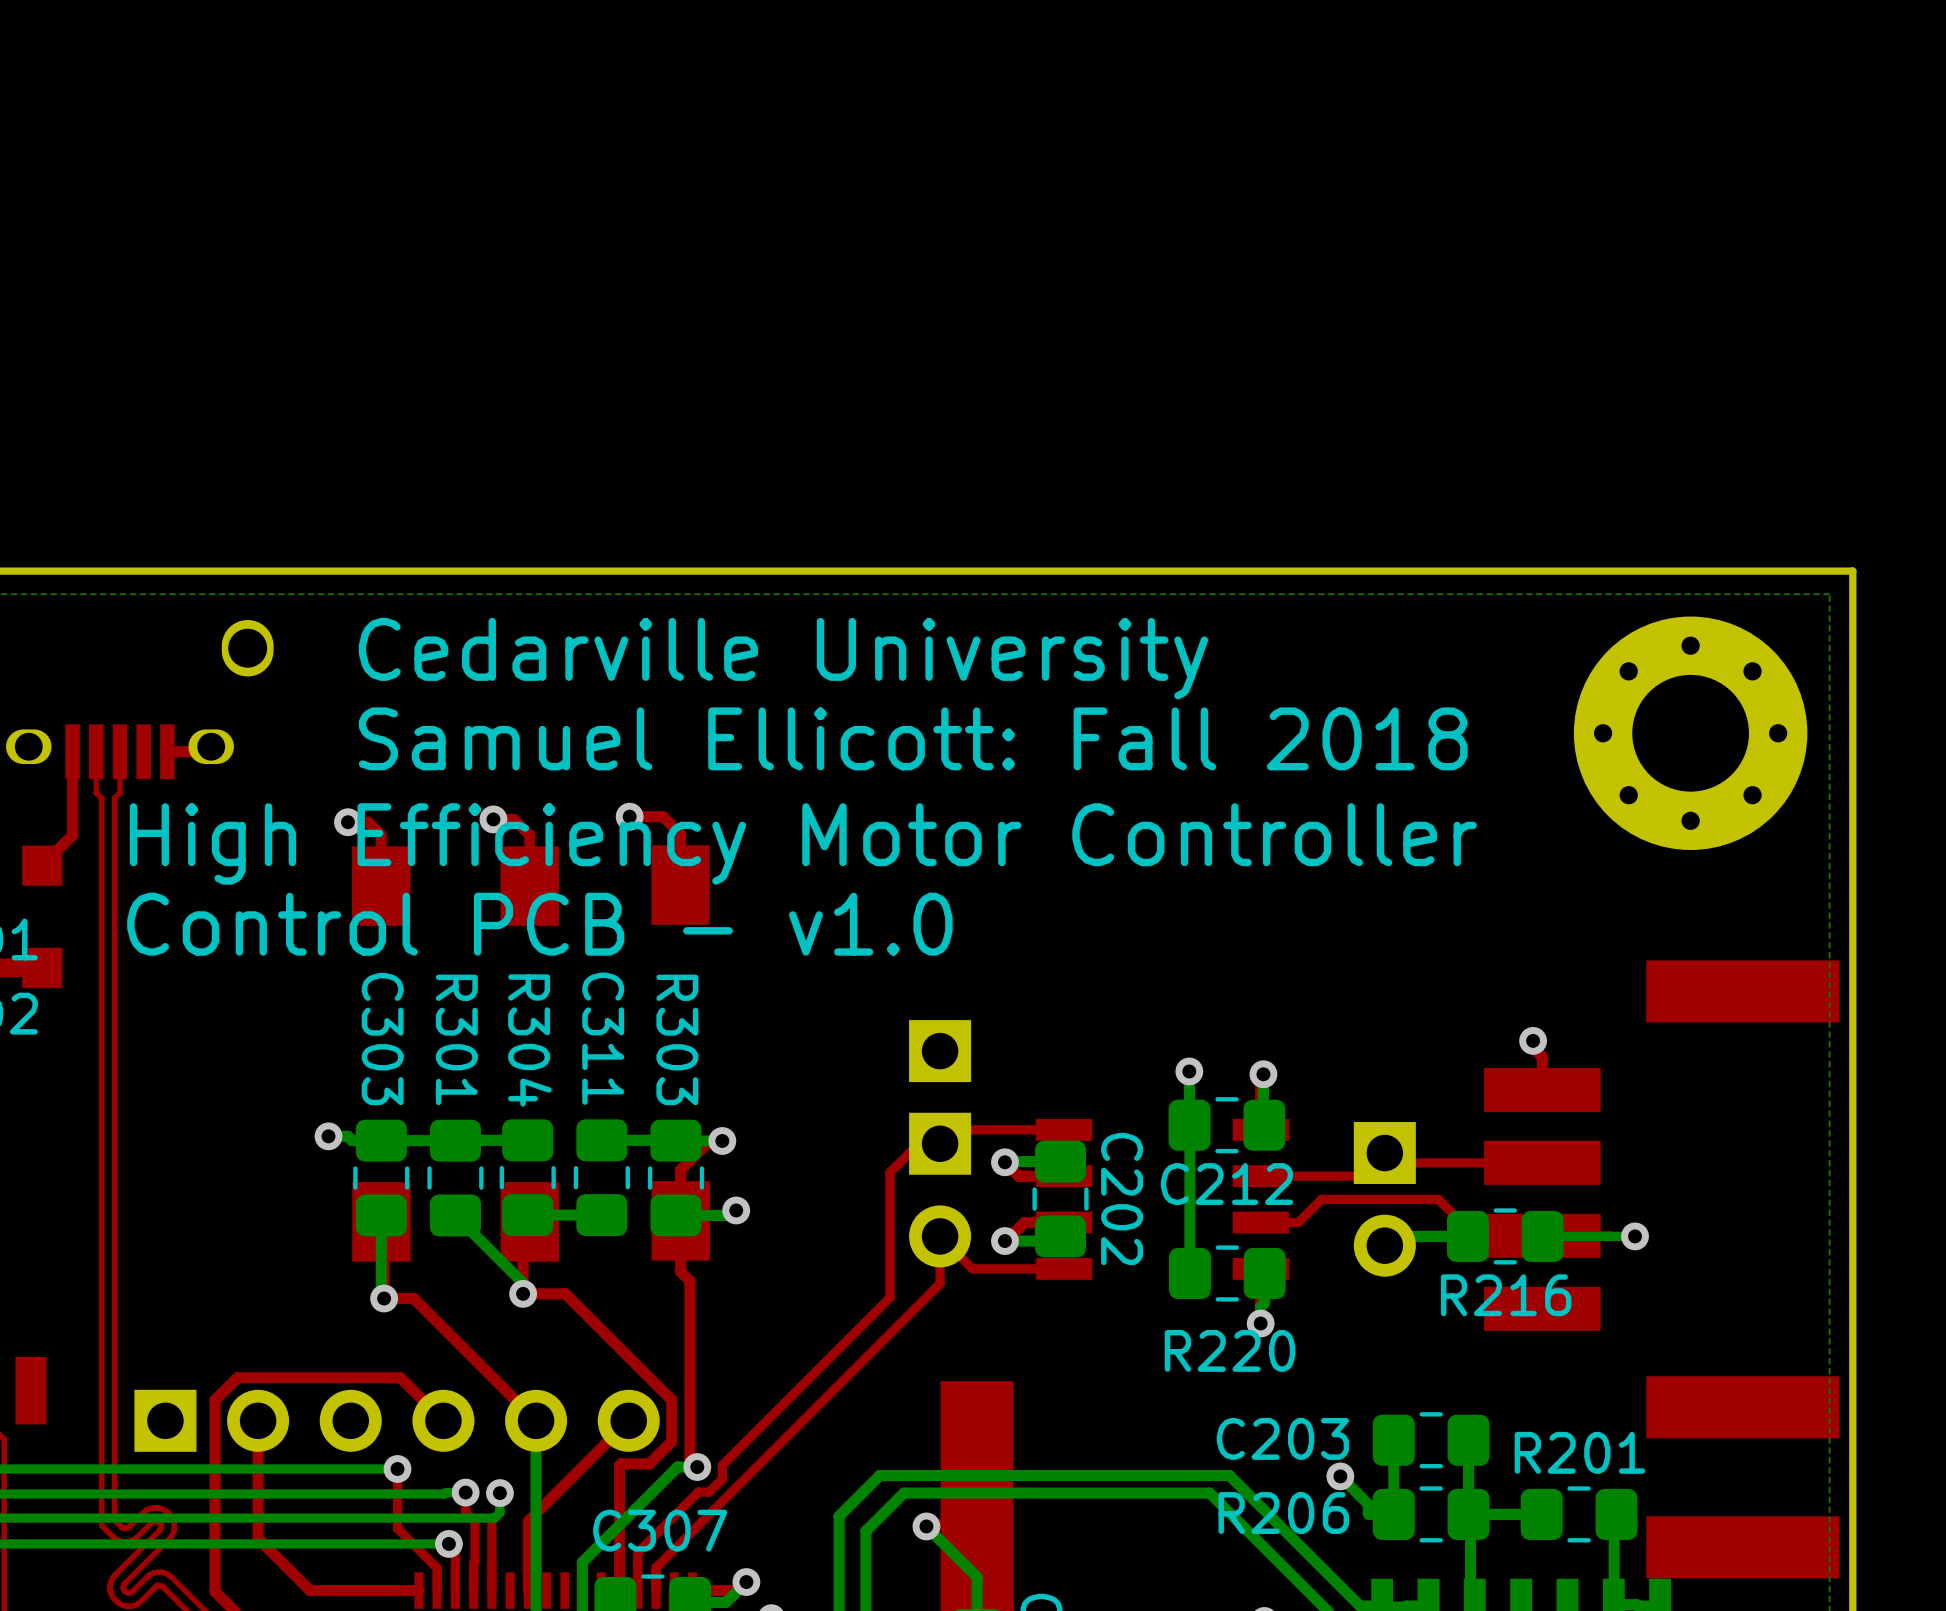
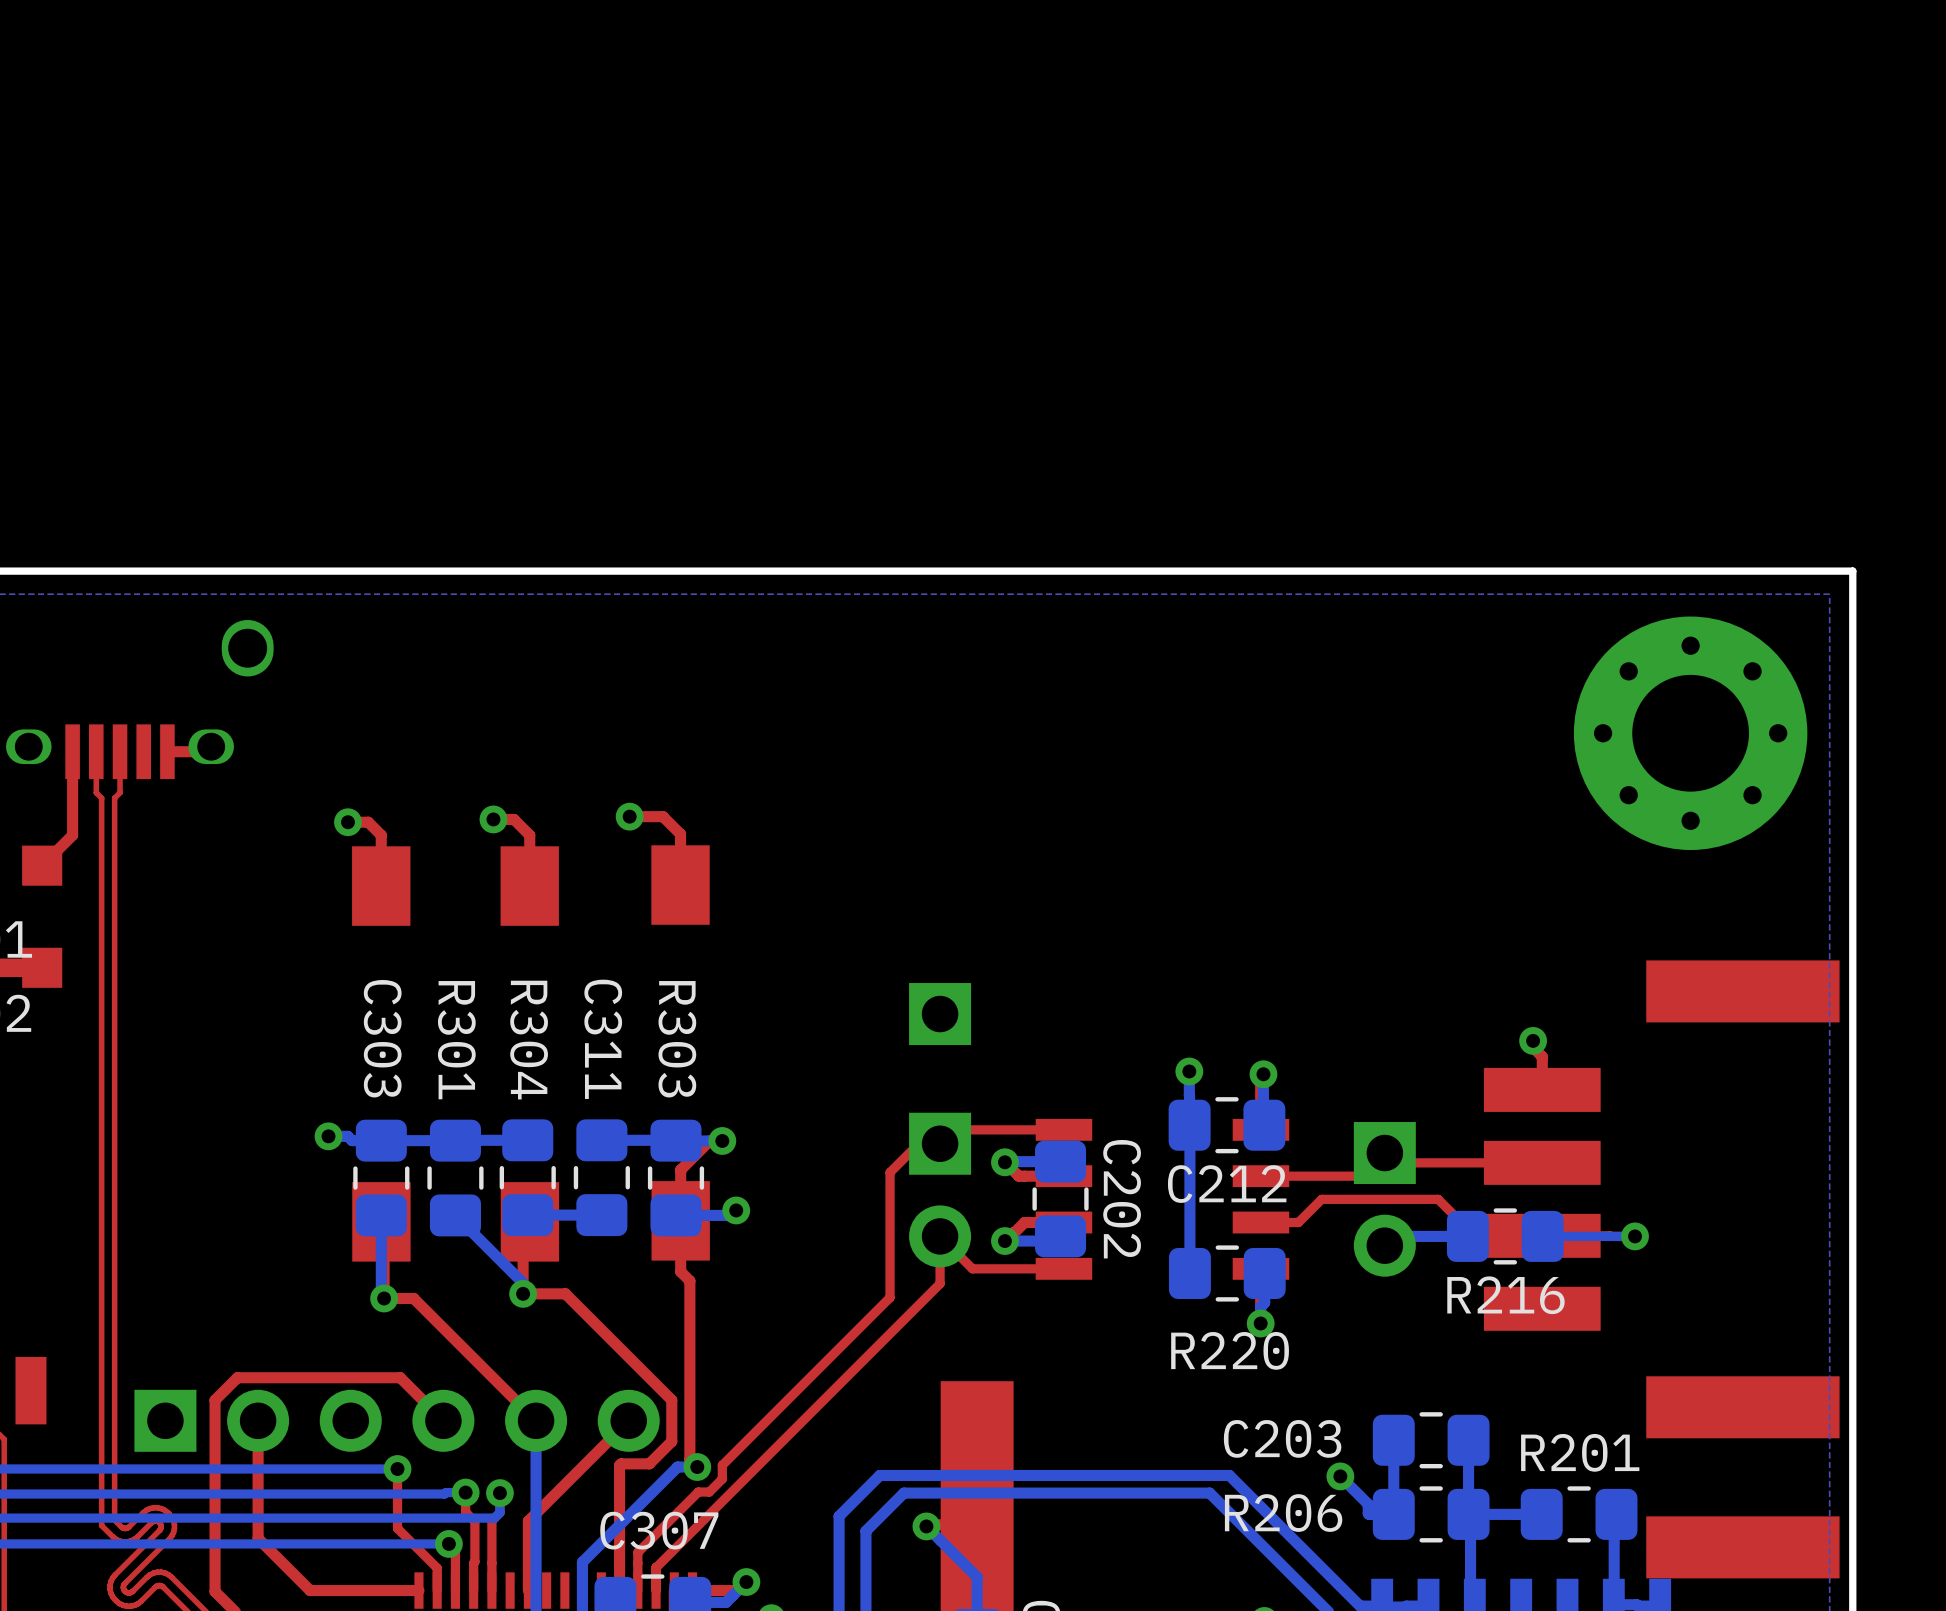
text: Cedarville University (783, 658) -> none
text: Samuel Ellicott: Fall 2018 (913, 738) -> none
text: High Efficiency Motor Controller (803, 843) -> none
text: Control PCB - v1.0 (539, 924) -> none
part position: (940, 1051) -> (940, 1014)

